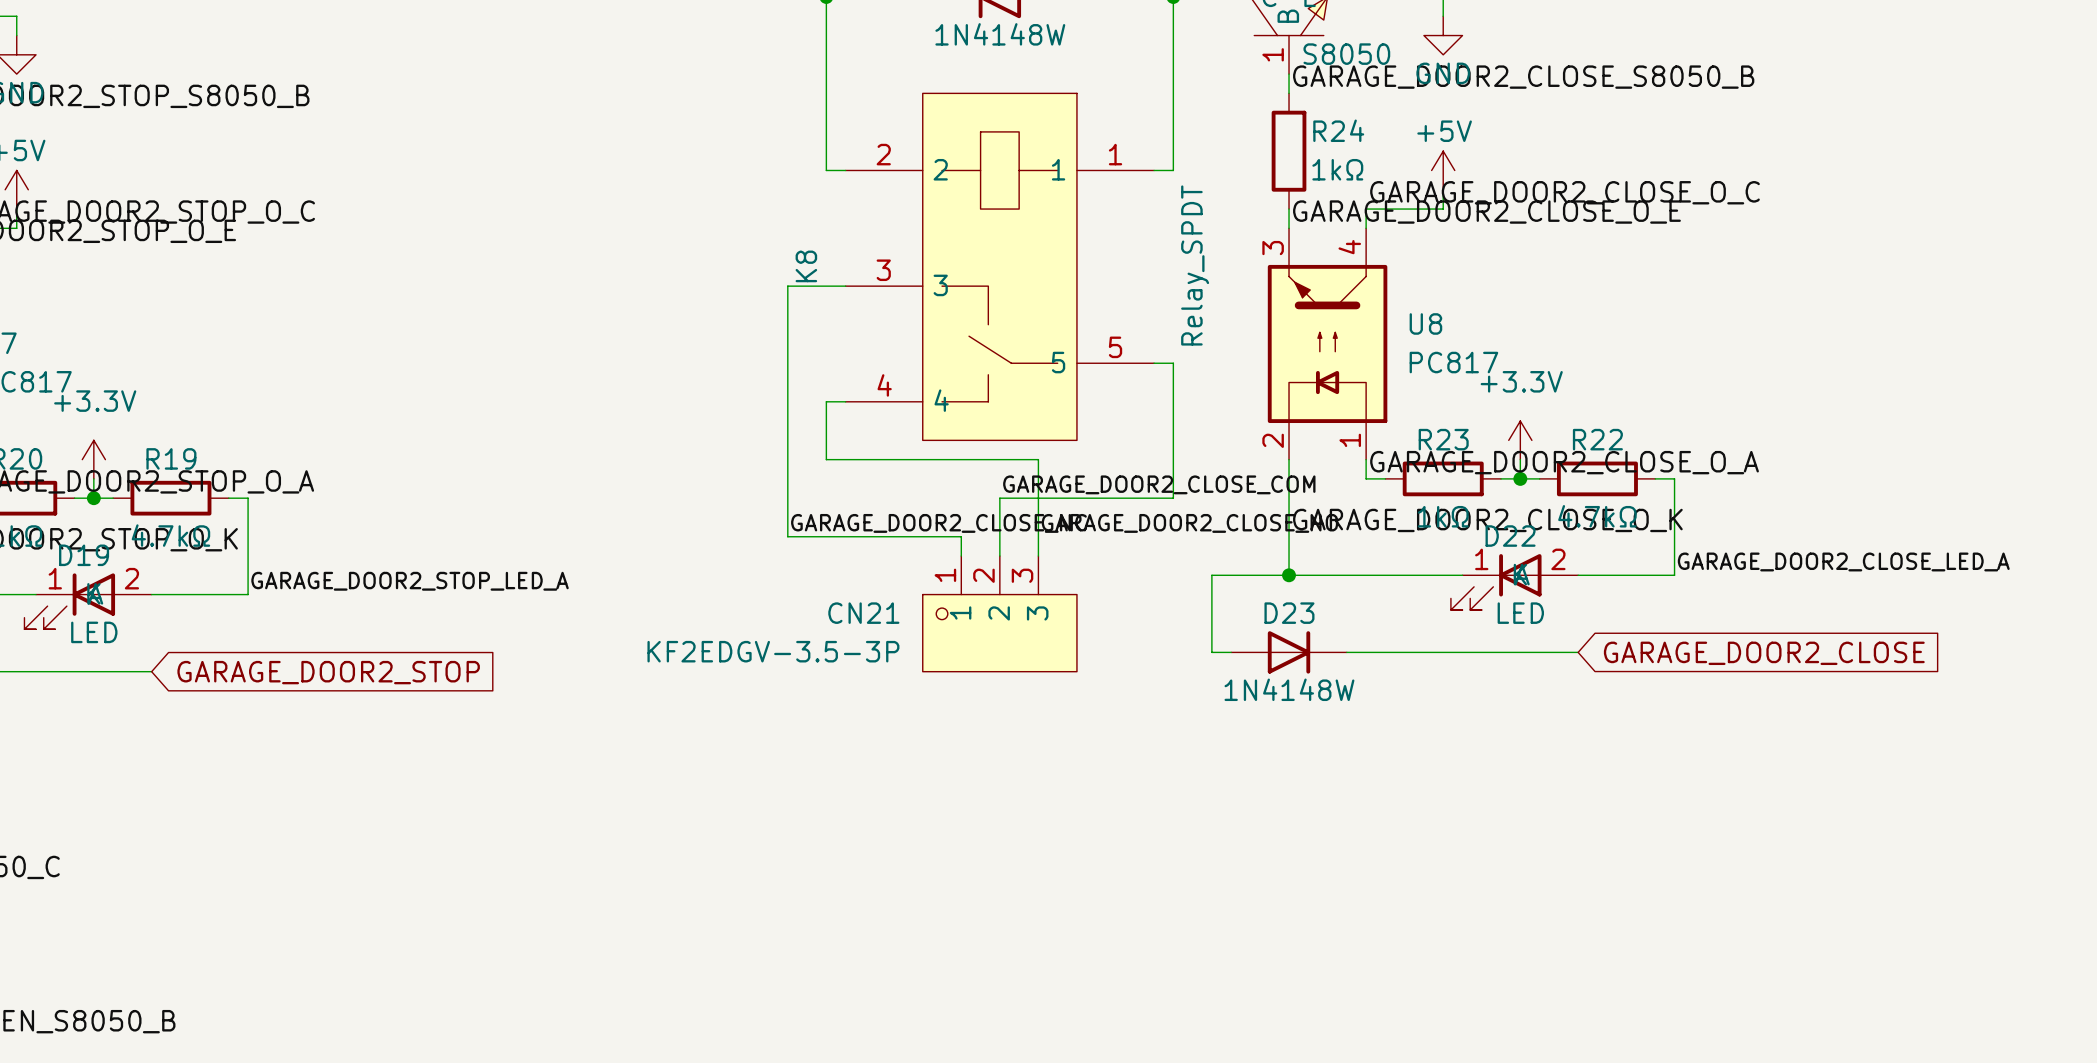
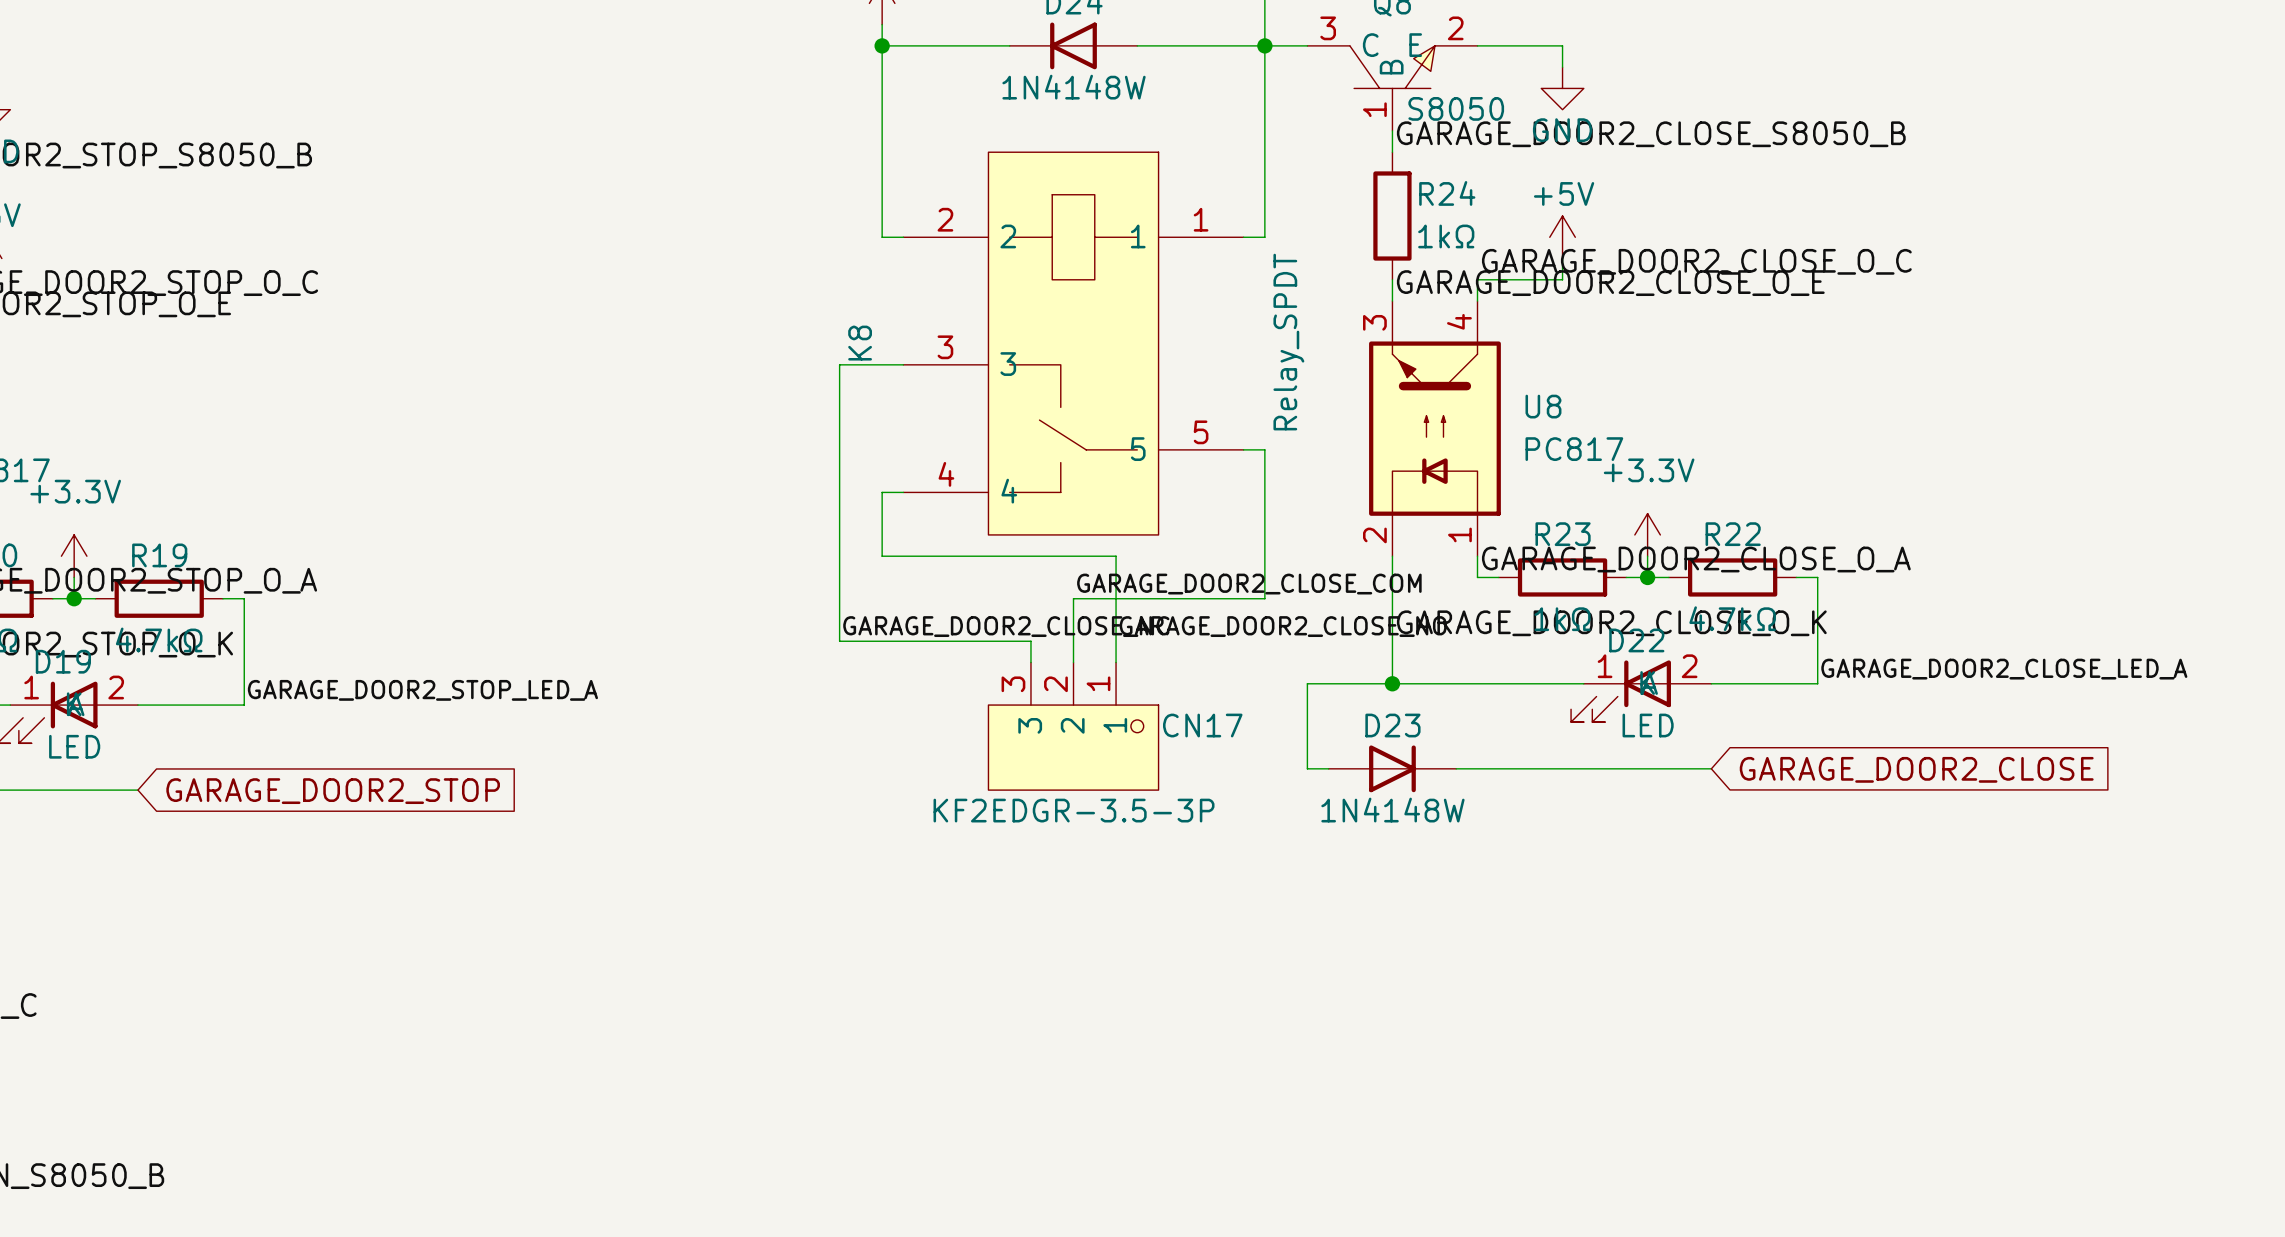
CN21: KF2EDGV-3.5-3P (999, 613) -> none
CN17: none -> KF2EDGR-3.5-3P (1073, 726)

